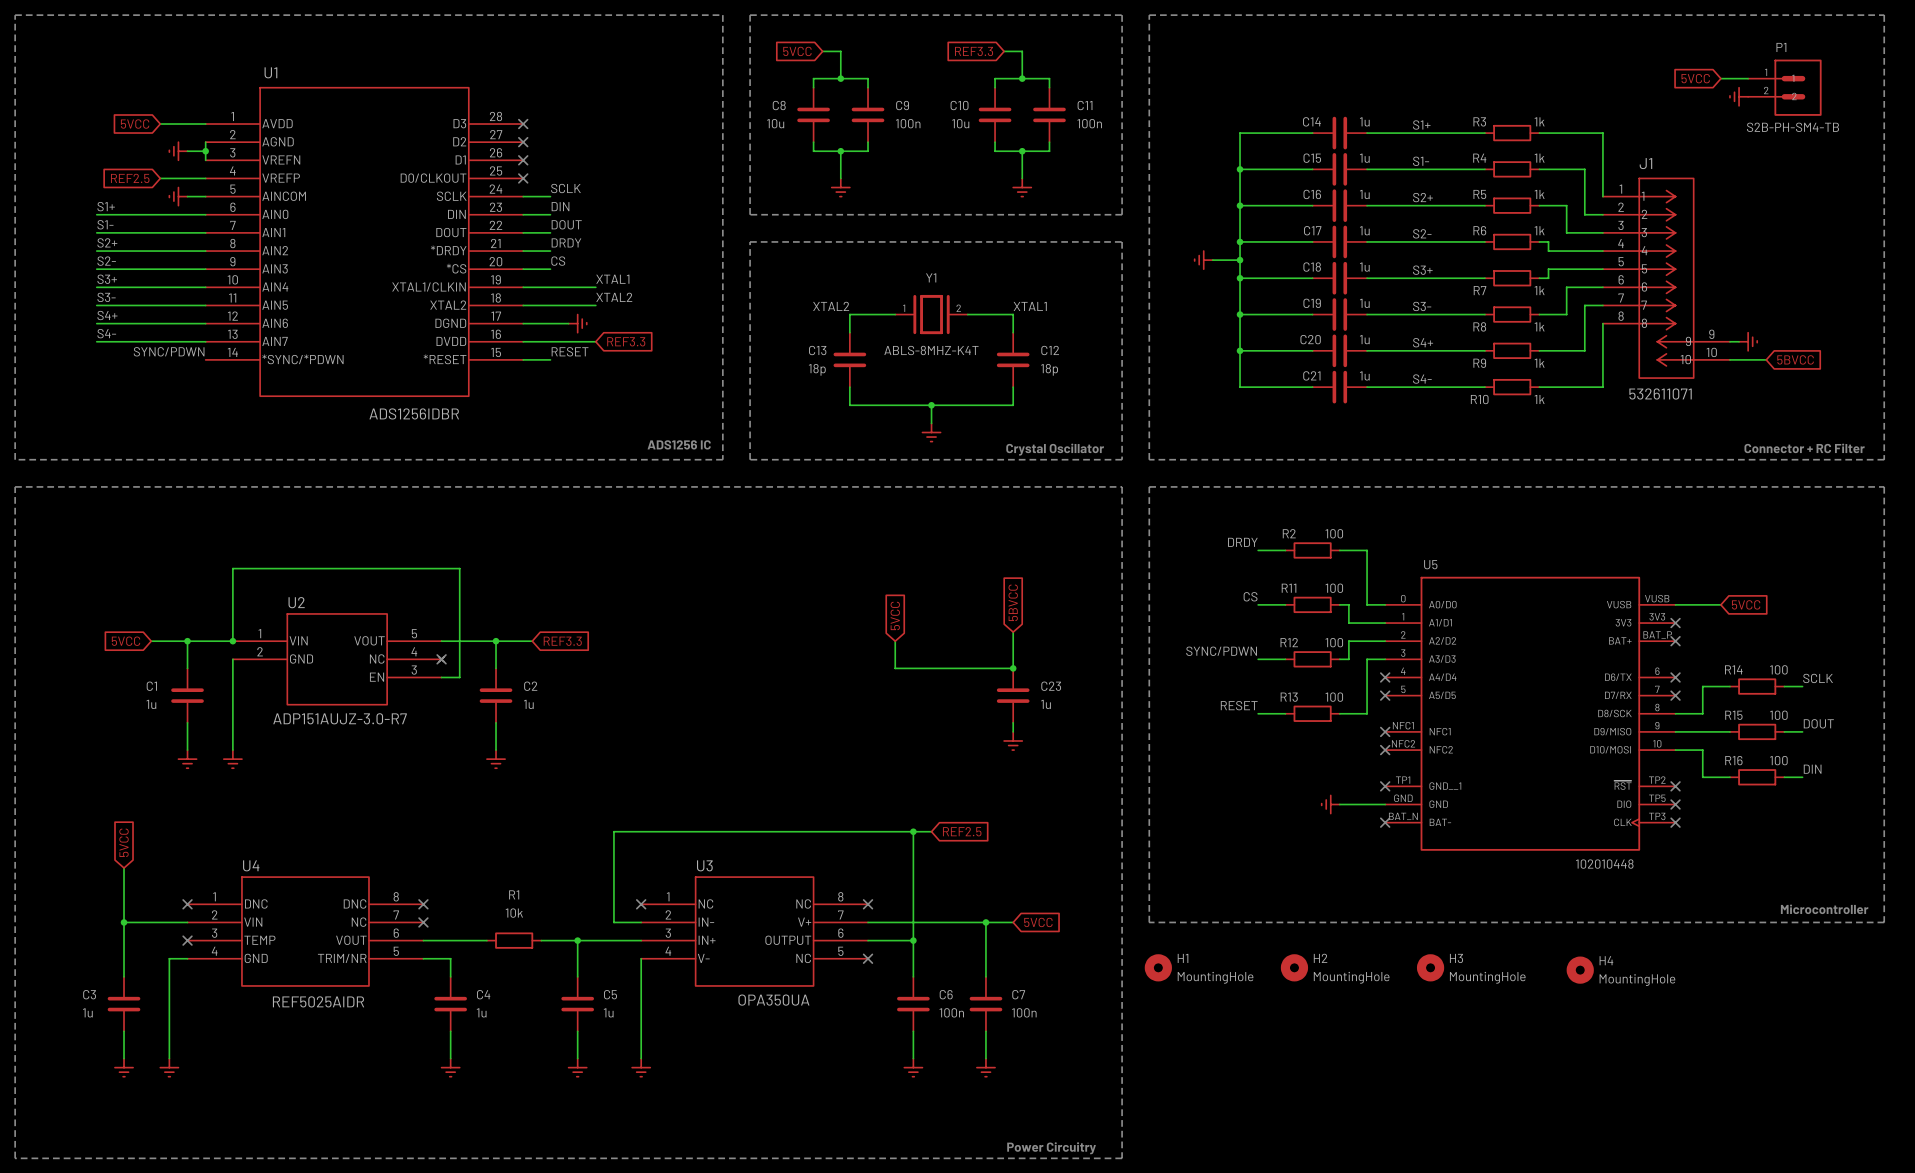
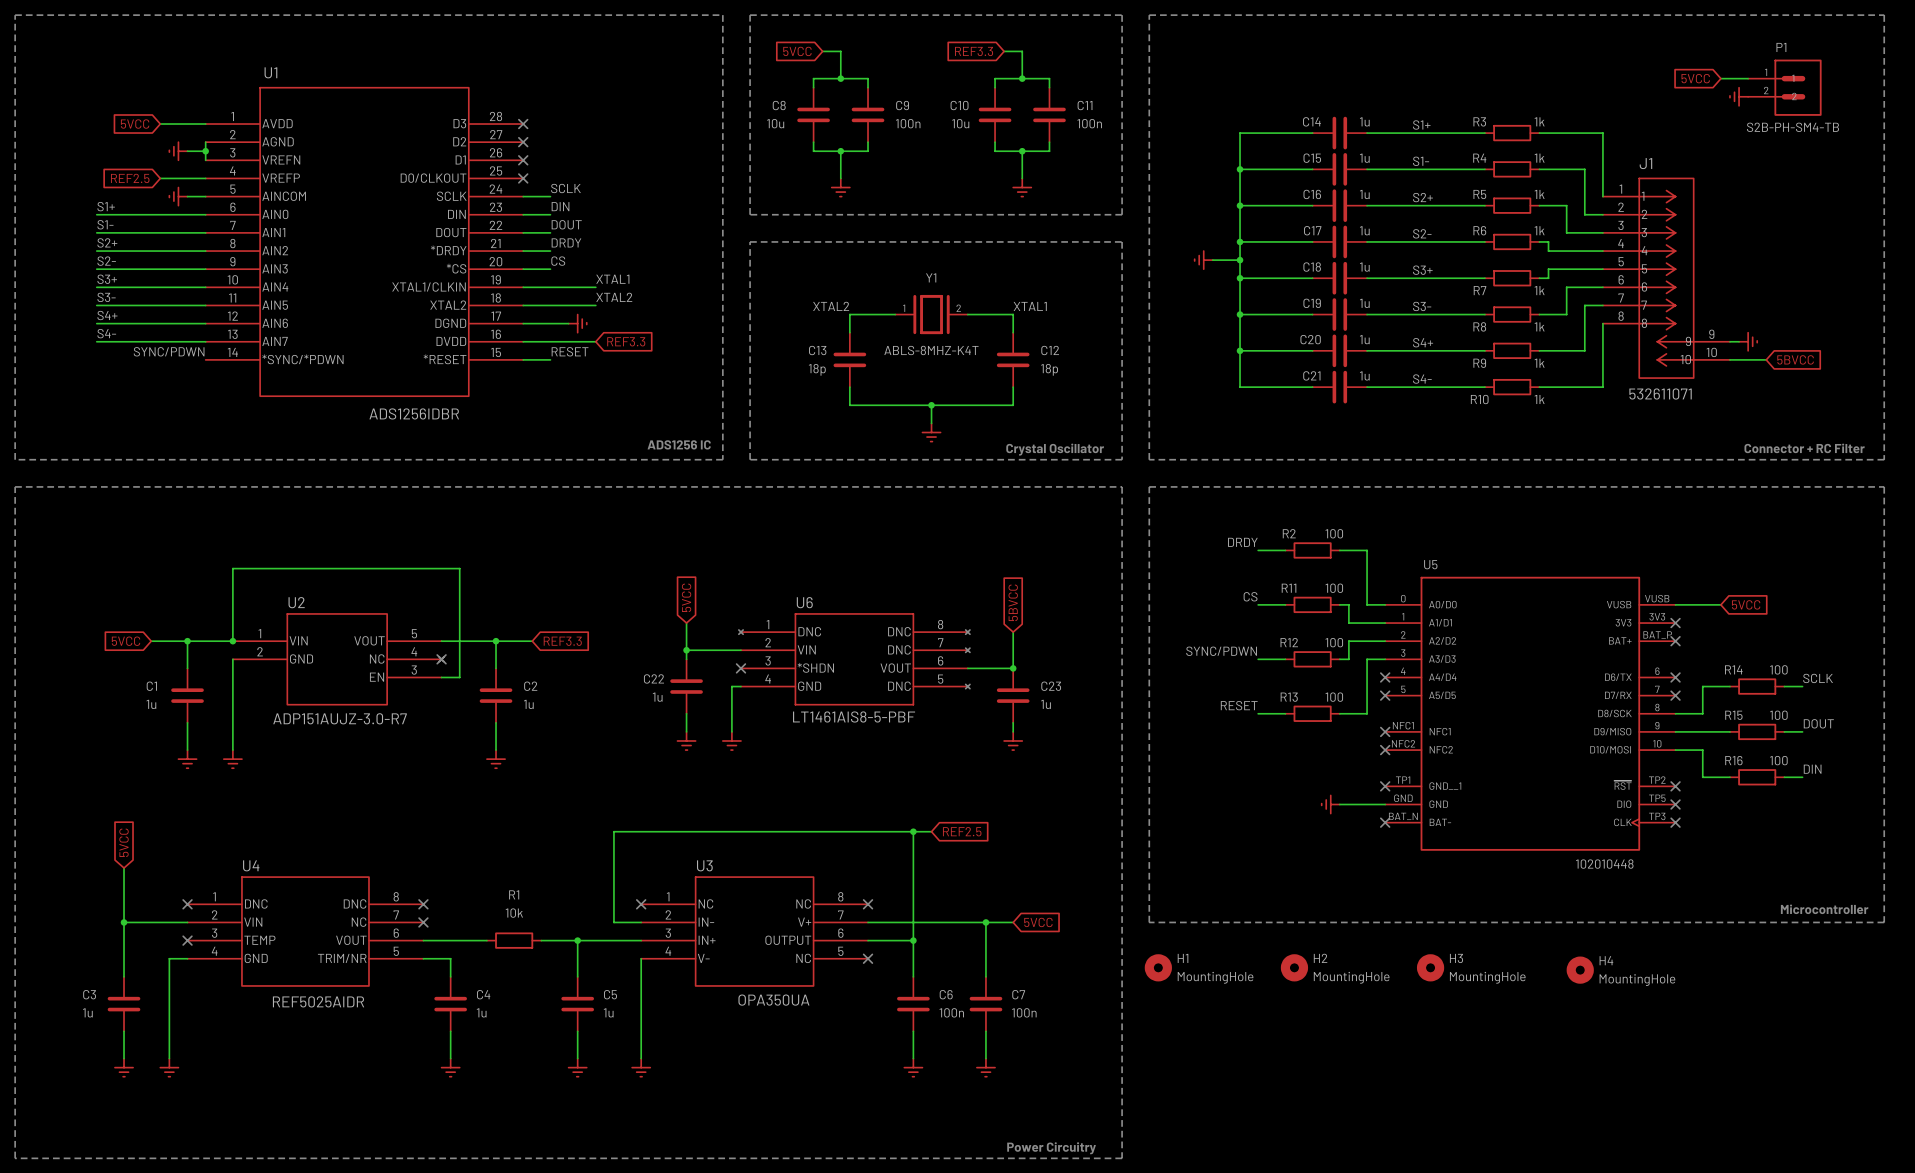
global label: none -> 5VCC (686, 597)
global label: 5VCC (895, 615) -> none
wire: none -> (686, 623) (686, 659)
wire: (895, 641) (895, 668) (967, 668) -> none
wire: none -> (686, 650) (740, 650)
junction: none -> (686, 650)
U6: none -> LT1461AIS8-5-PBF (854, 659)
no-connect mark: none -> (740, 668)
C22: none -> 1u (686, 686)
wire: none -> (740, 686) (731, 686) (731, 731)
wire: none -> (686, 713) (686, 731)
power symbol: none -> (686, 740)
power symbol: none -> (731, 740)

